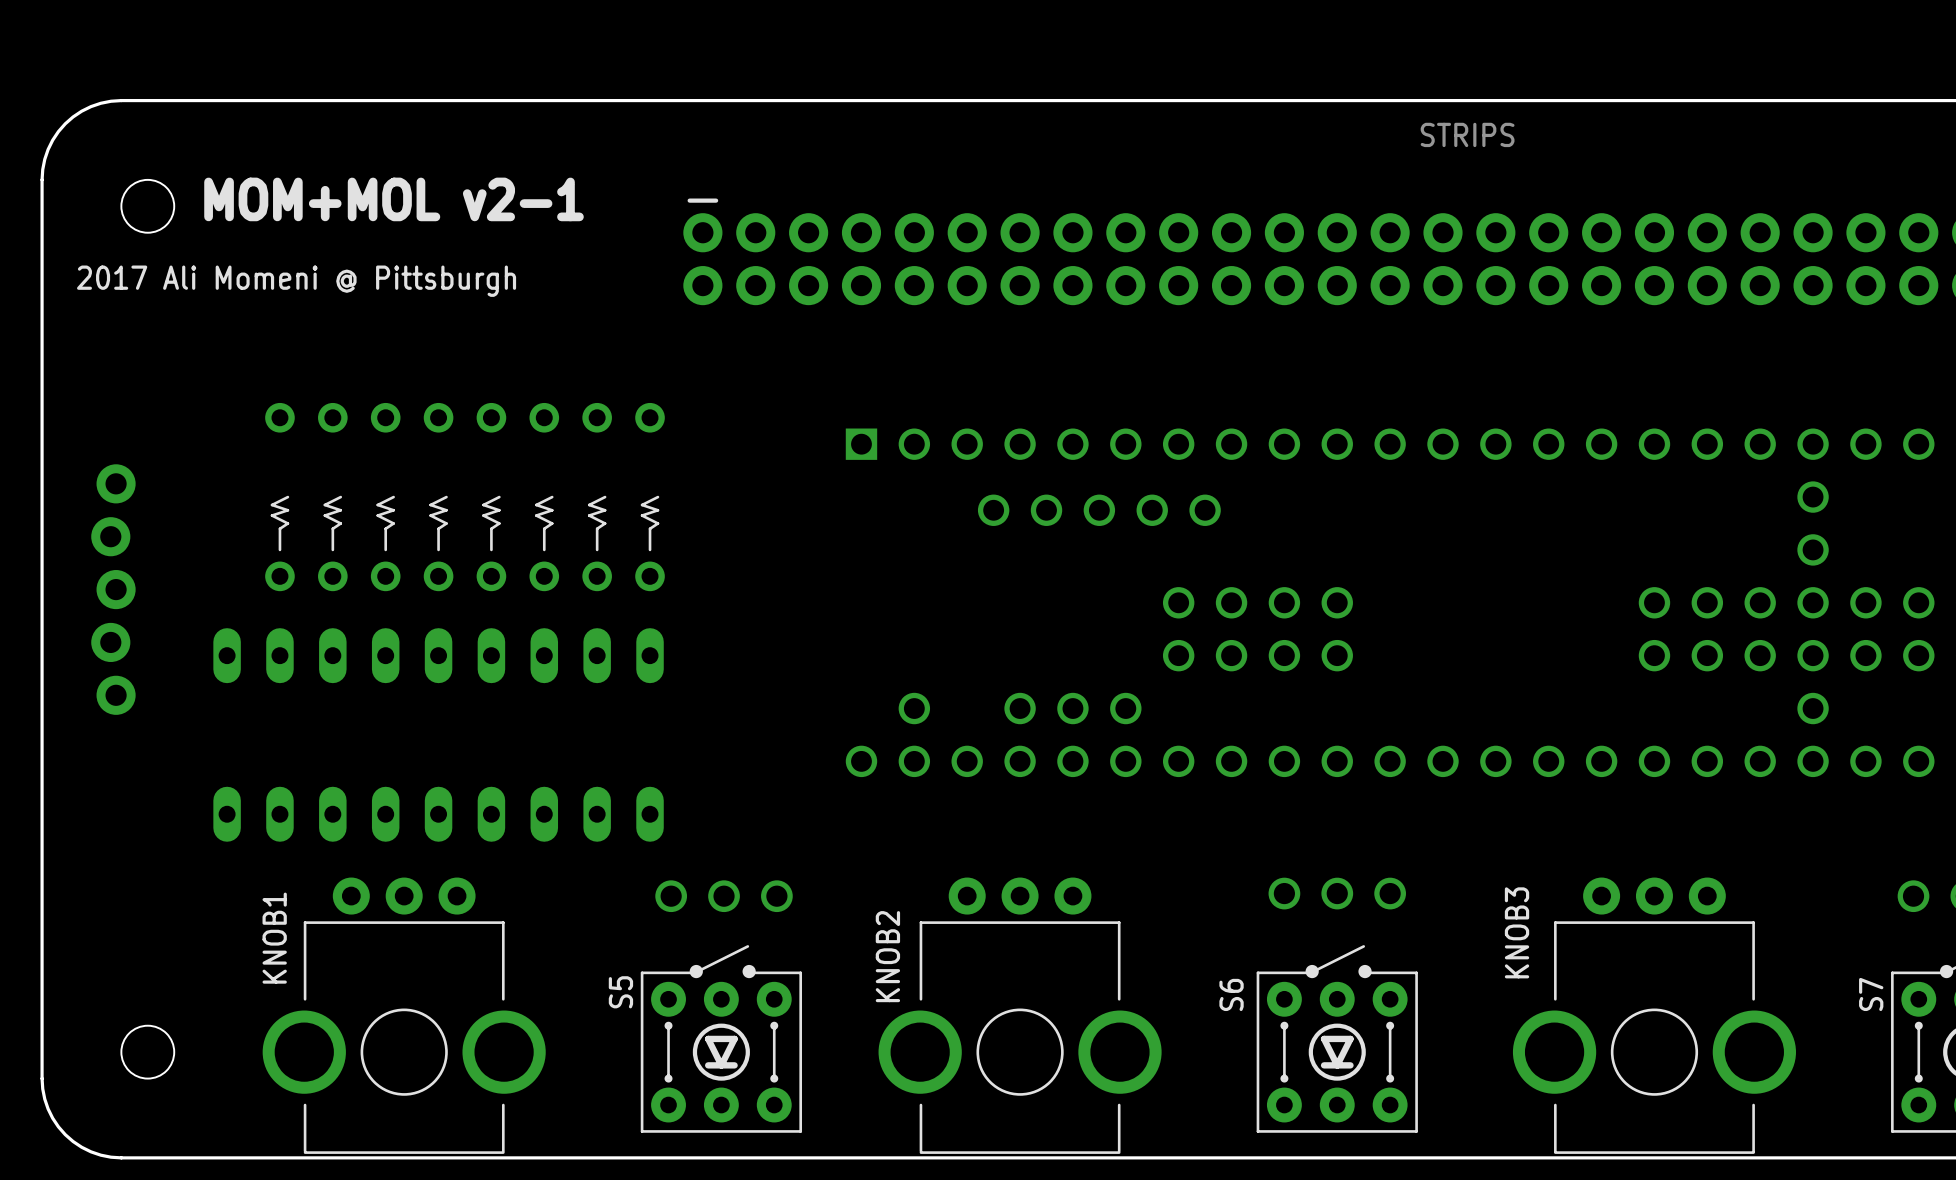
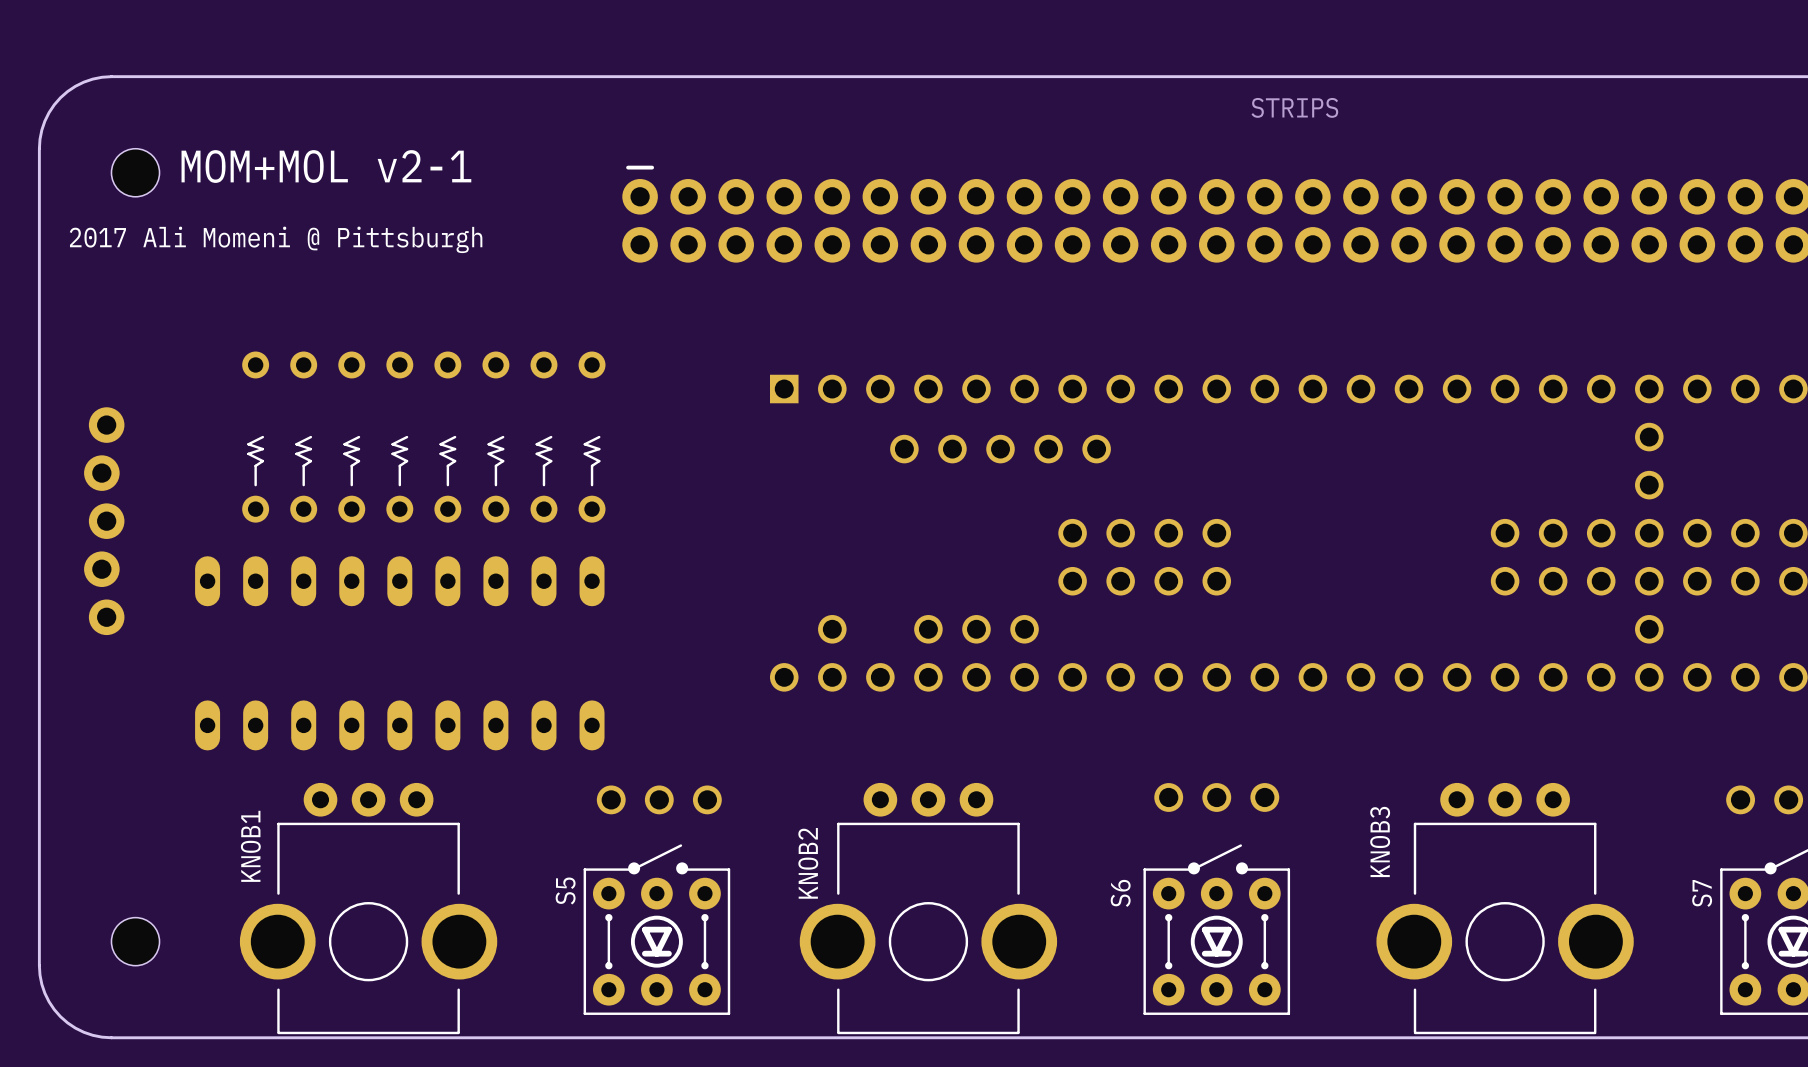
part value position: STRIPS (1467, 134) -> STRIPS (1294, 107)

